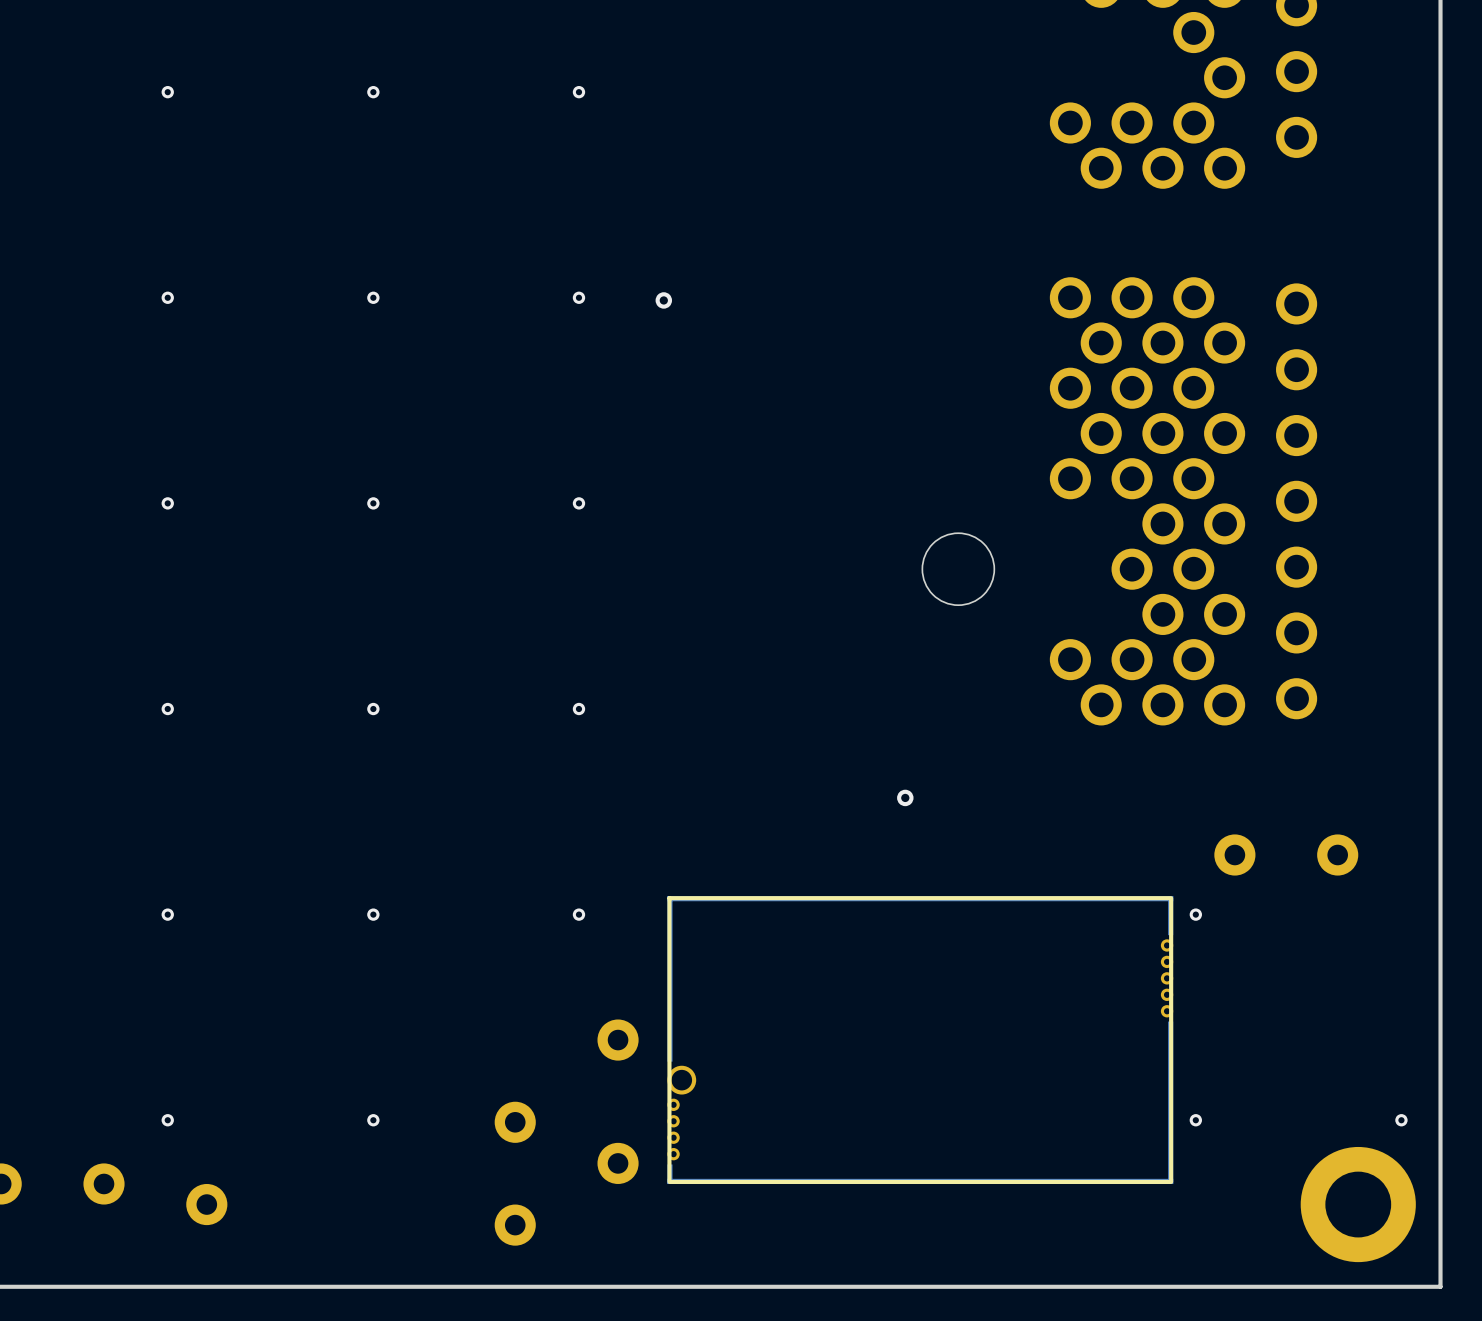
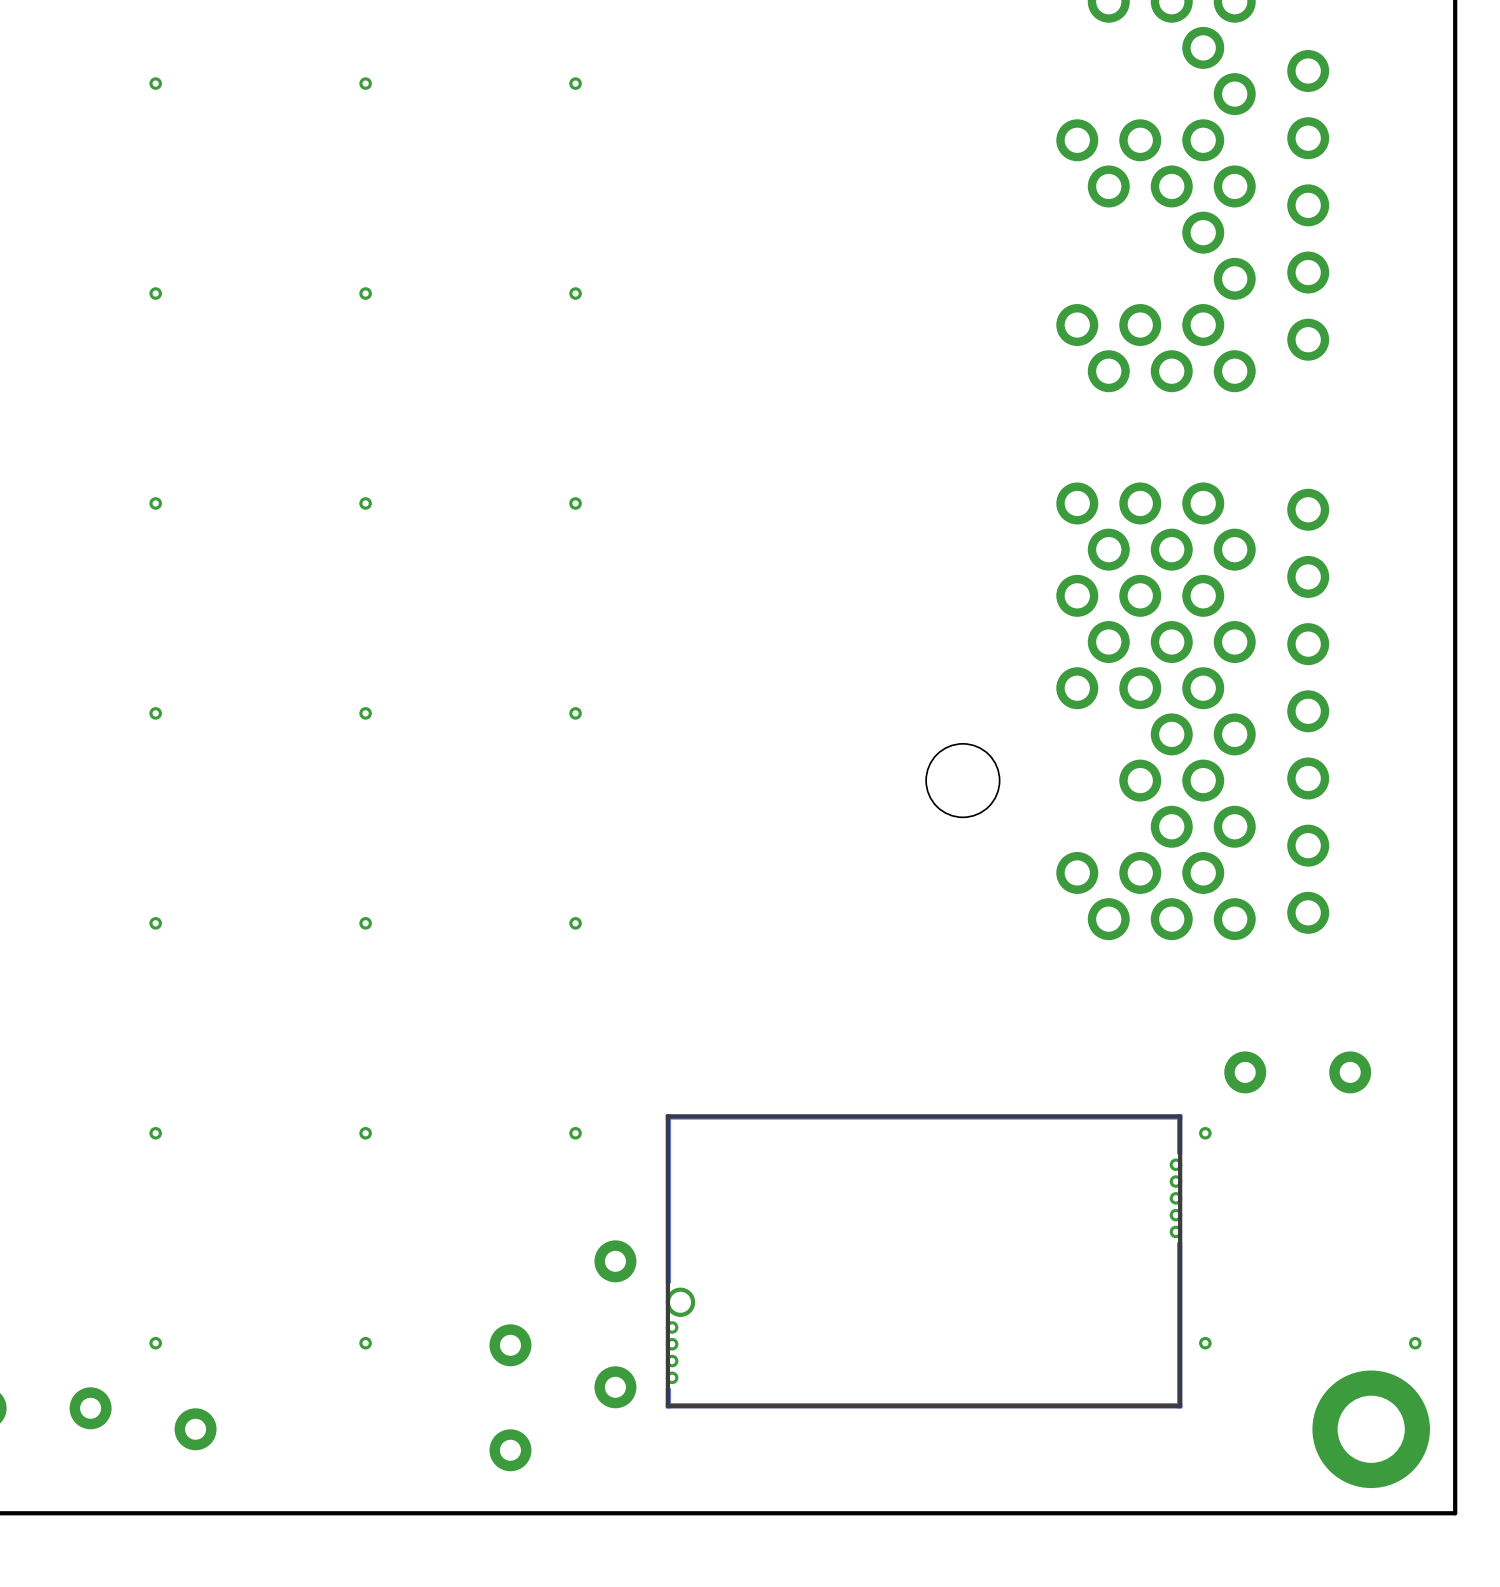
via: (663, 300) -> none
via: (905, 797) -> none

